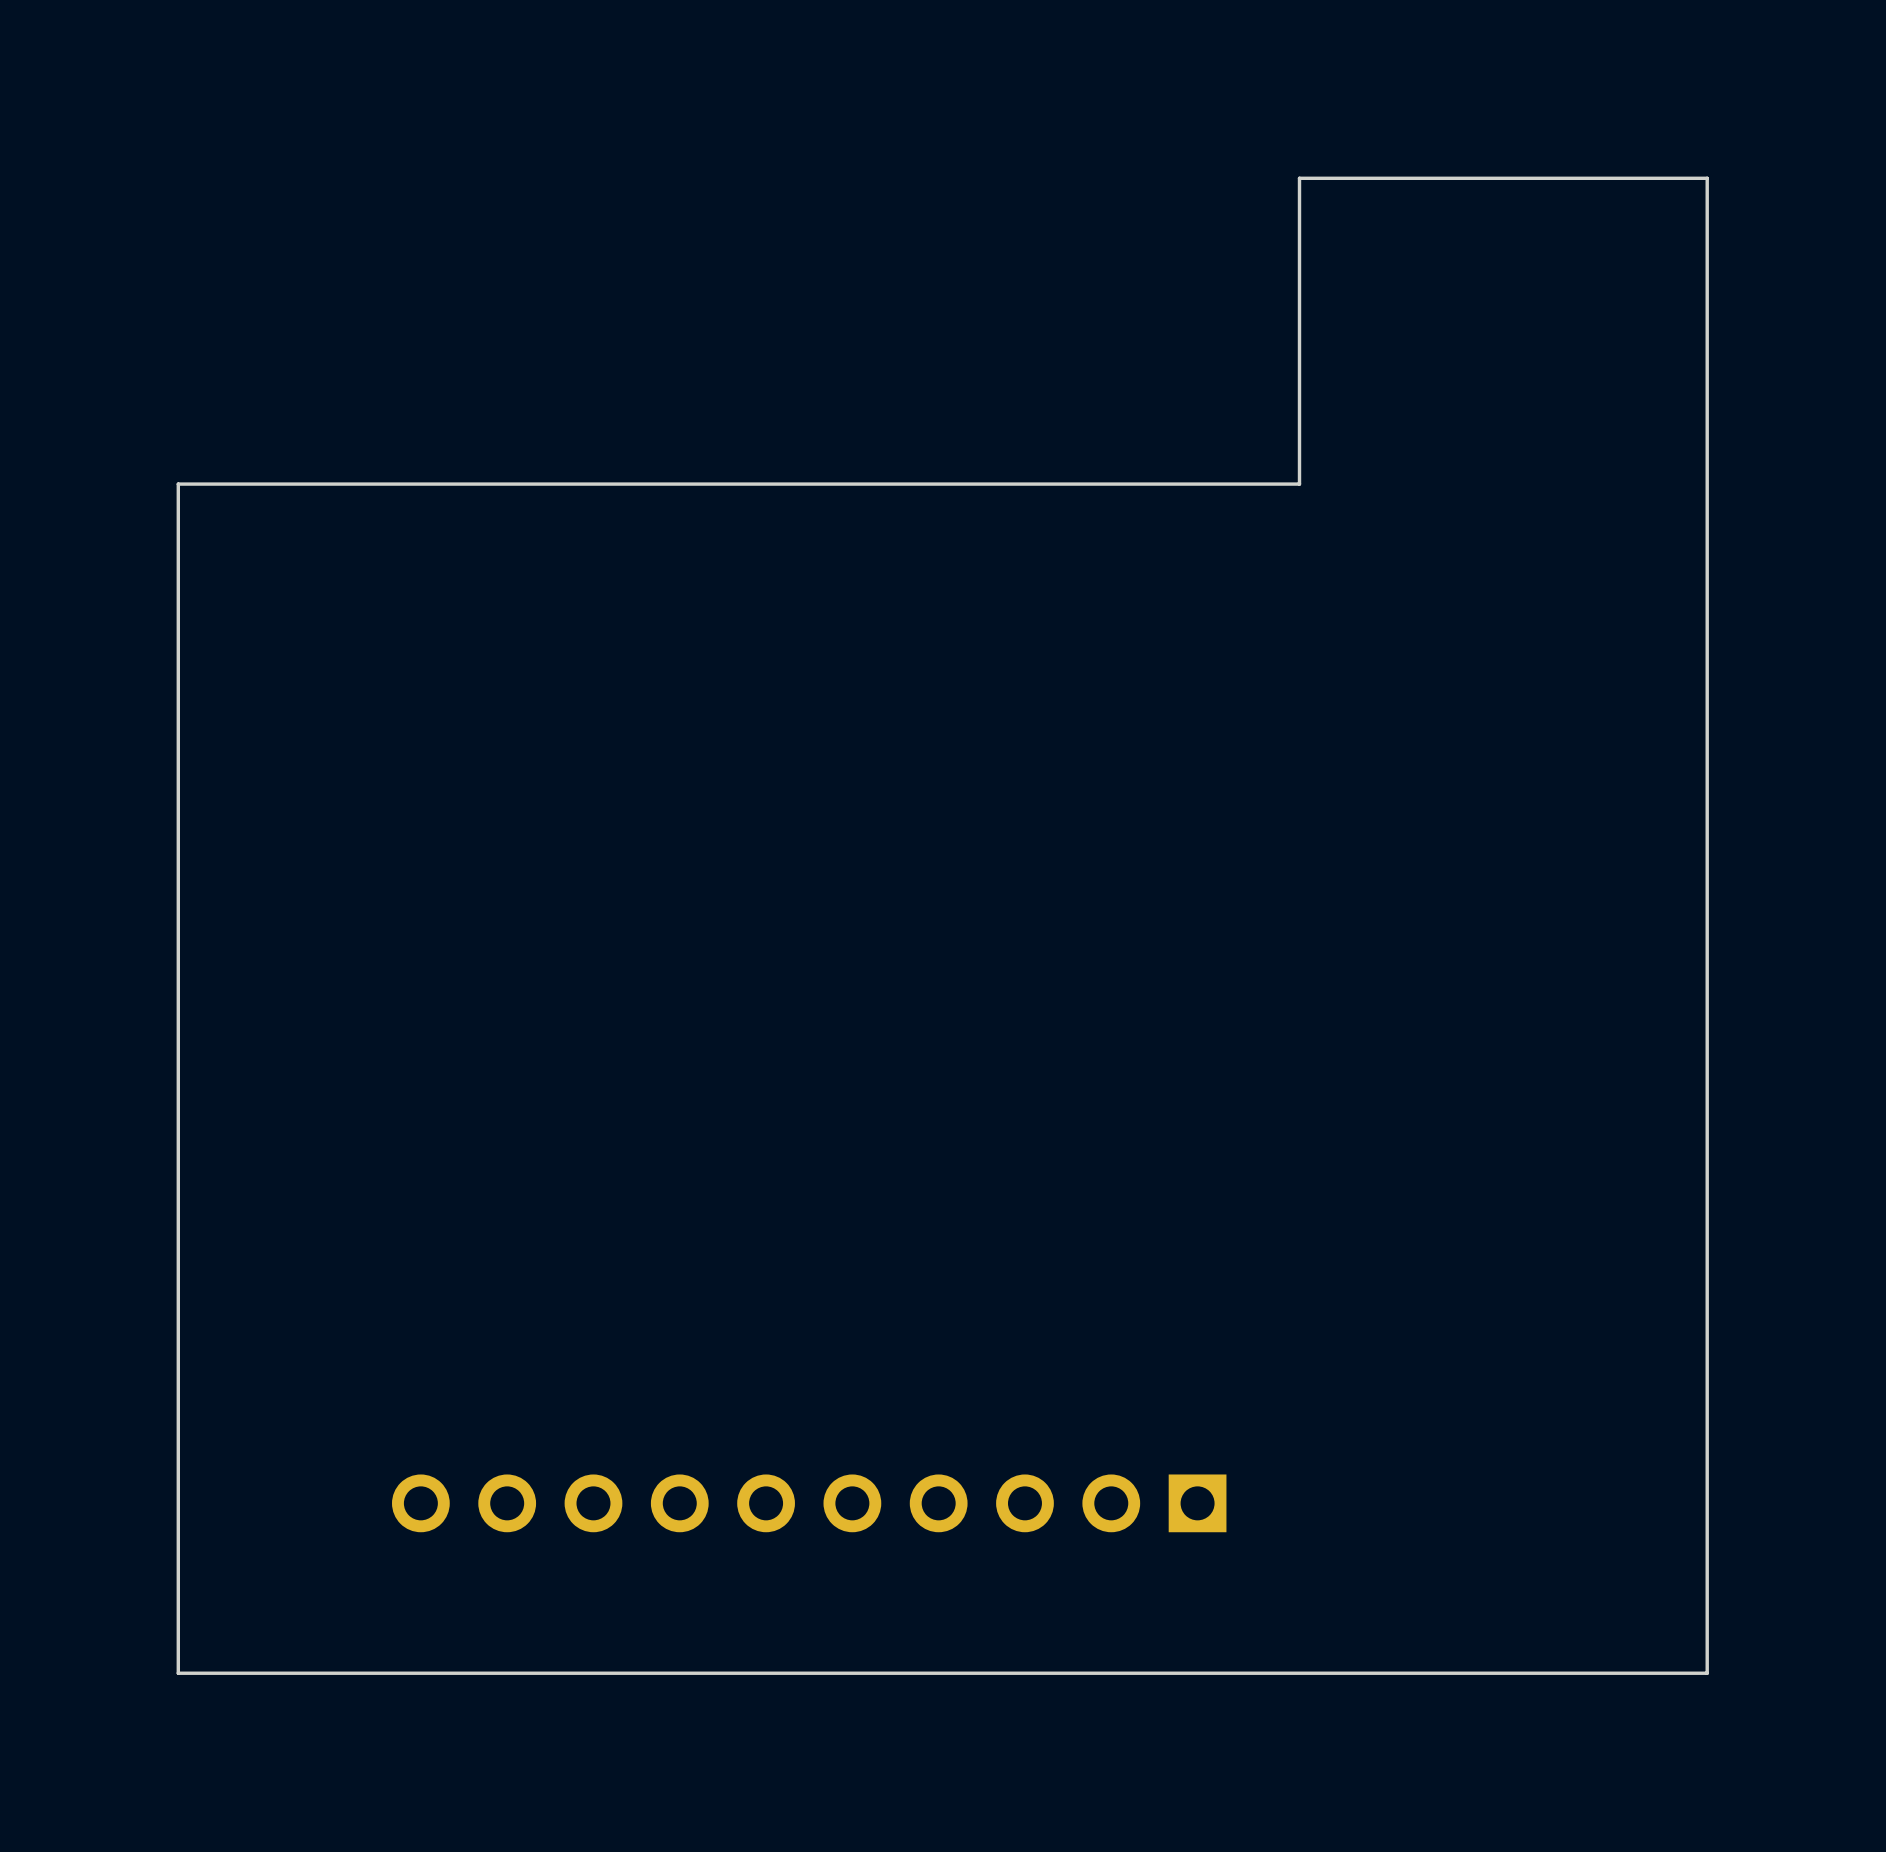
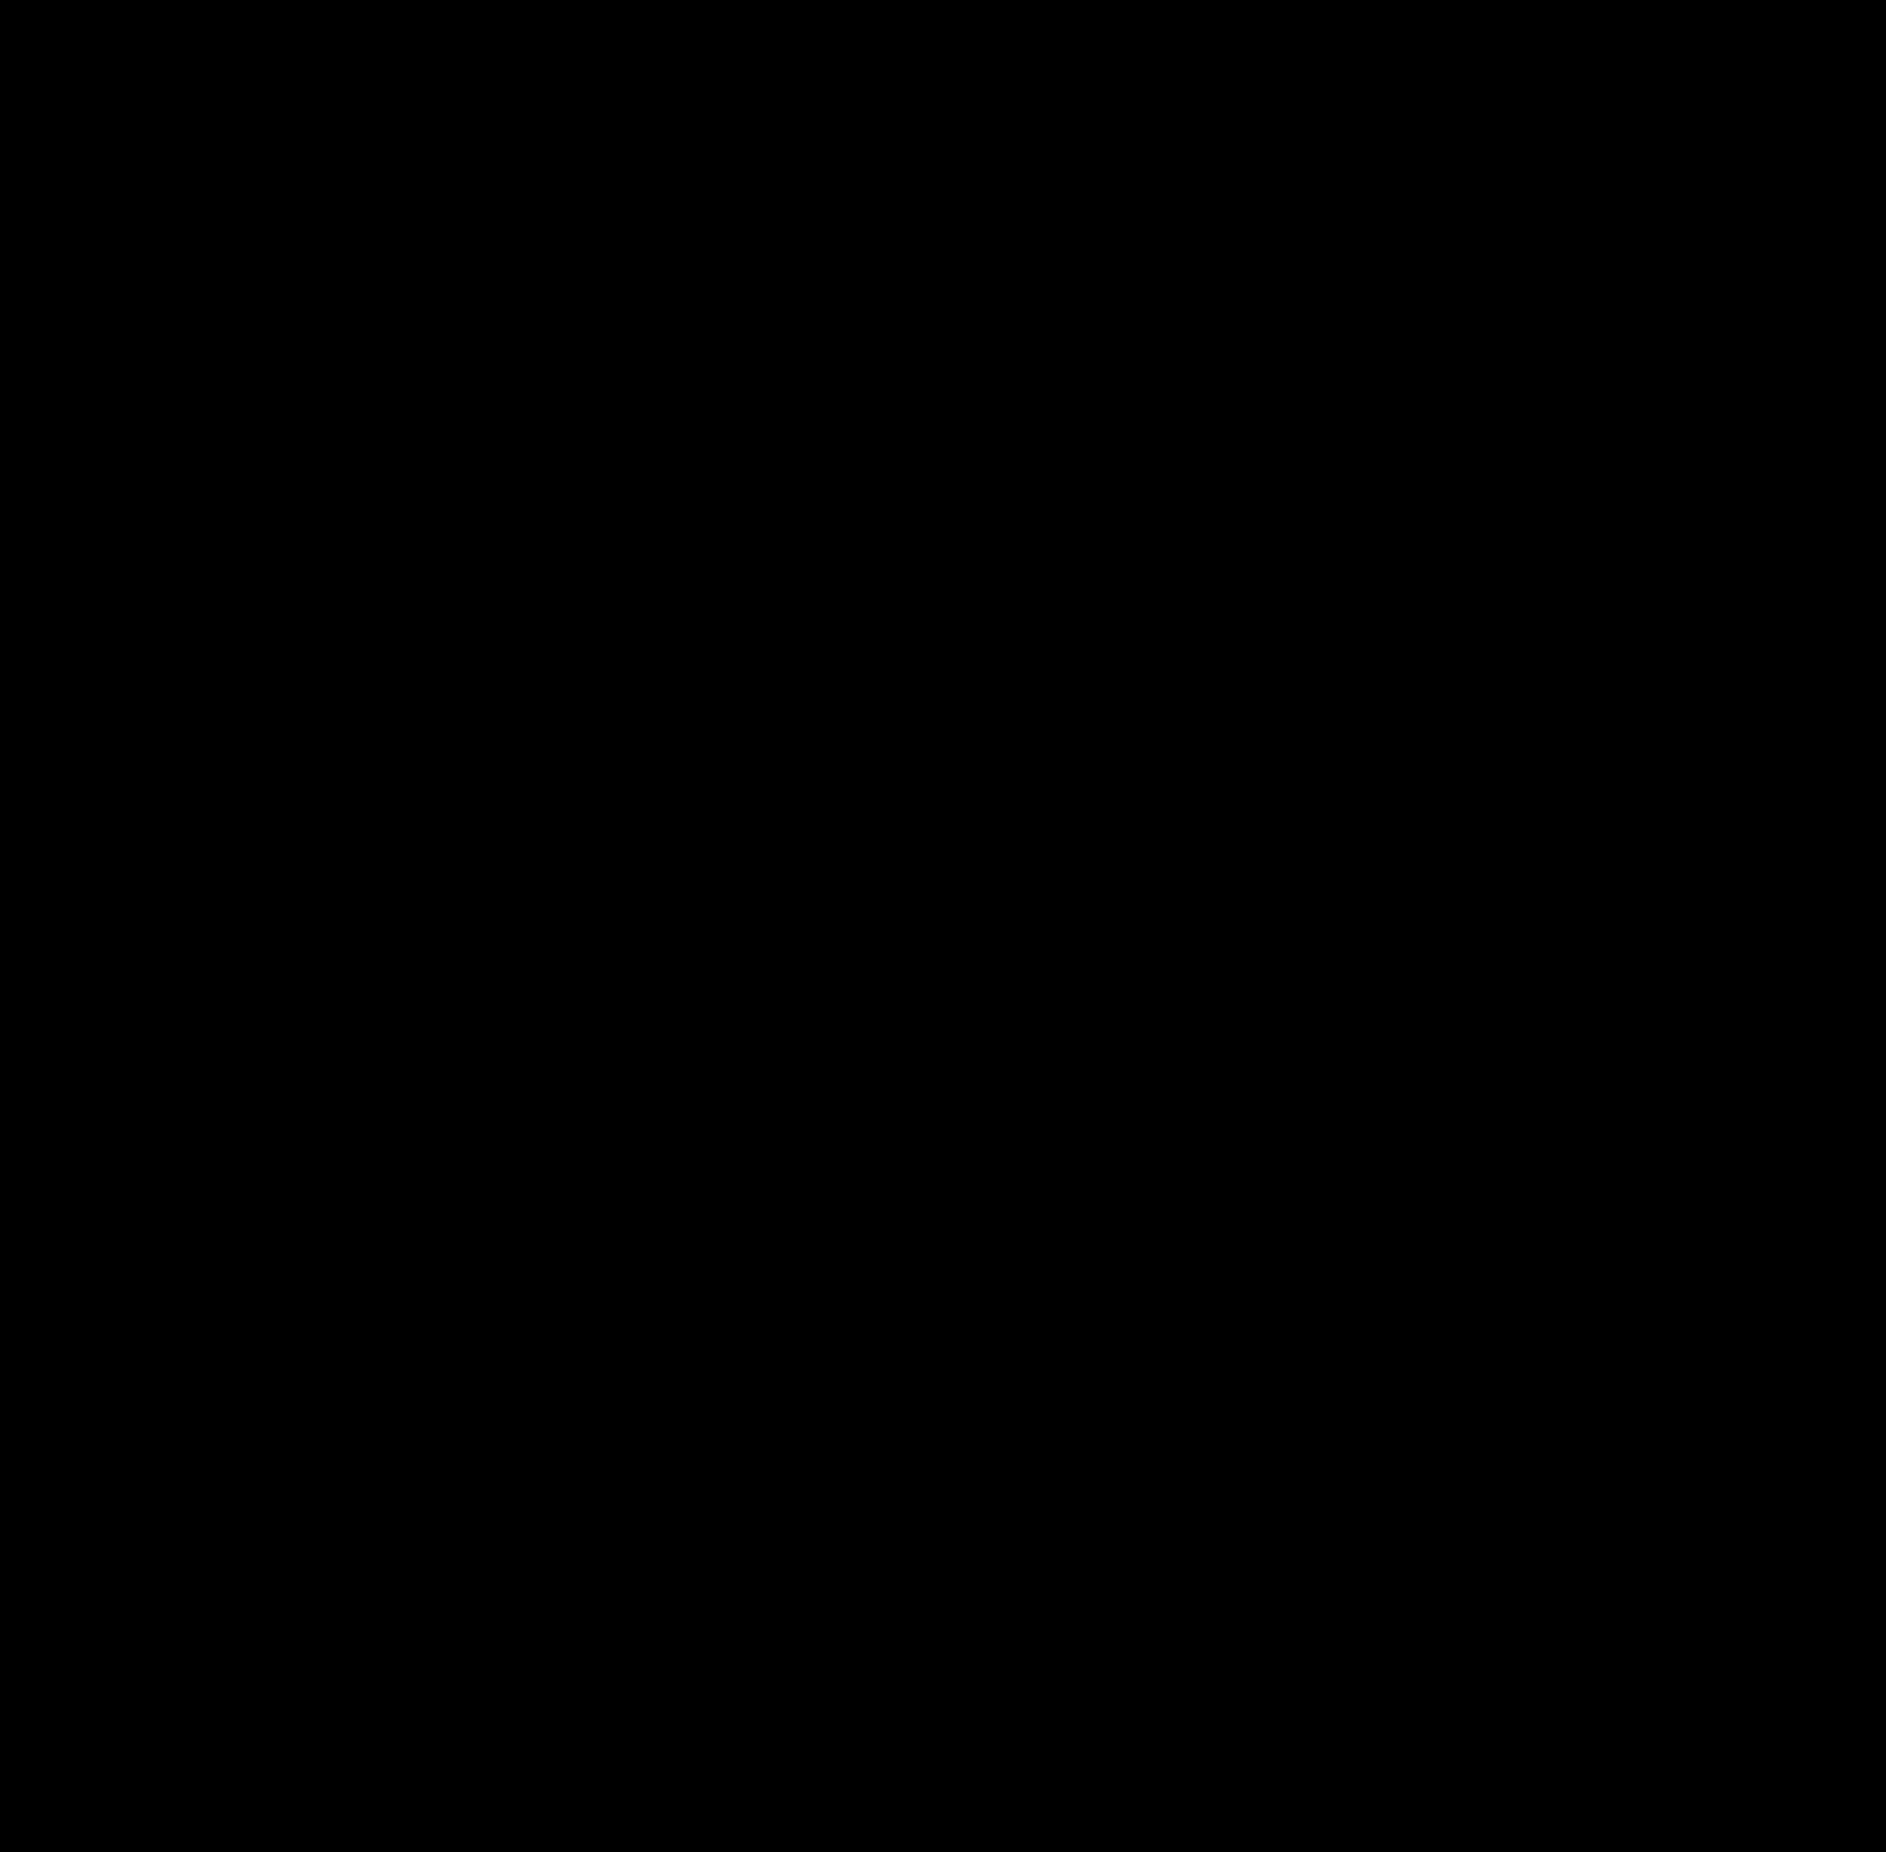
board edge: (1707, 178) (1707, 1673) (178, 1673) (178, 484) (1299, 484) (1299, 178) (1707, 178) -> none
part: (809, 1503) -> none

